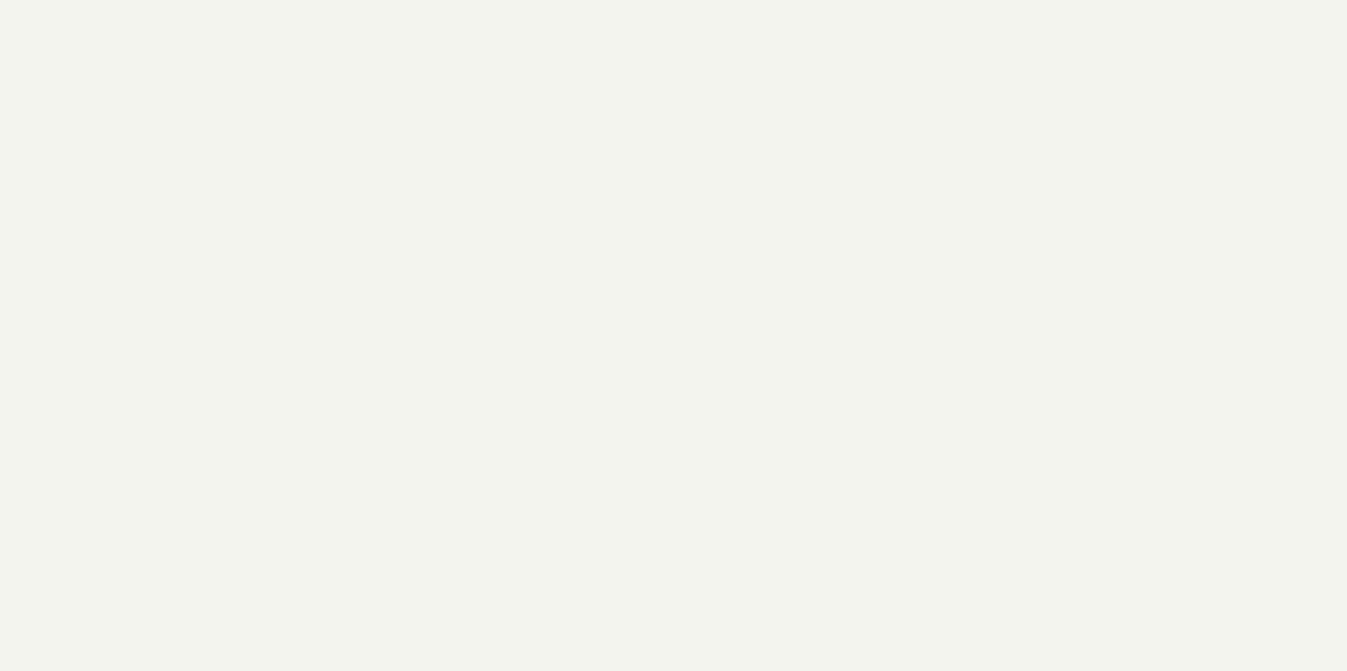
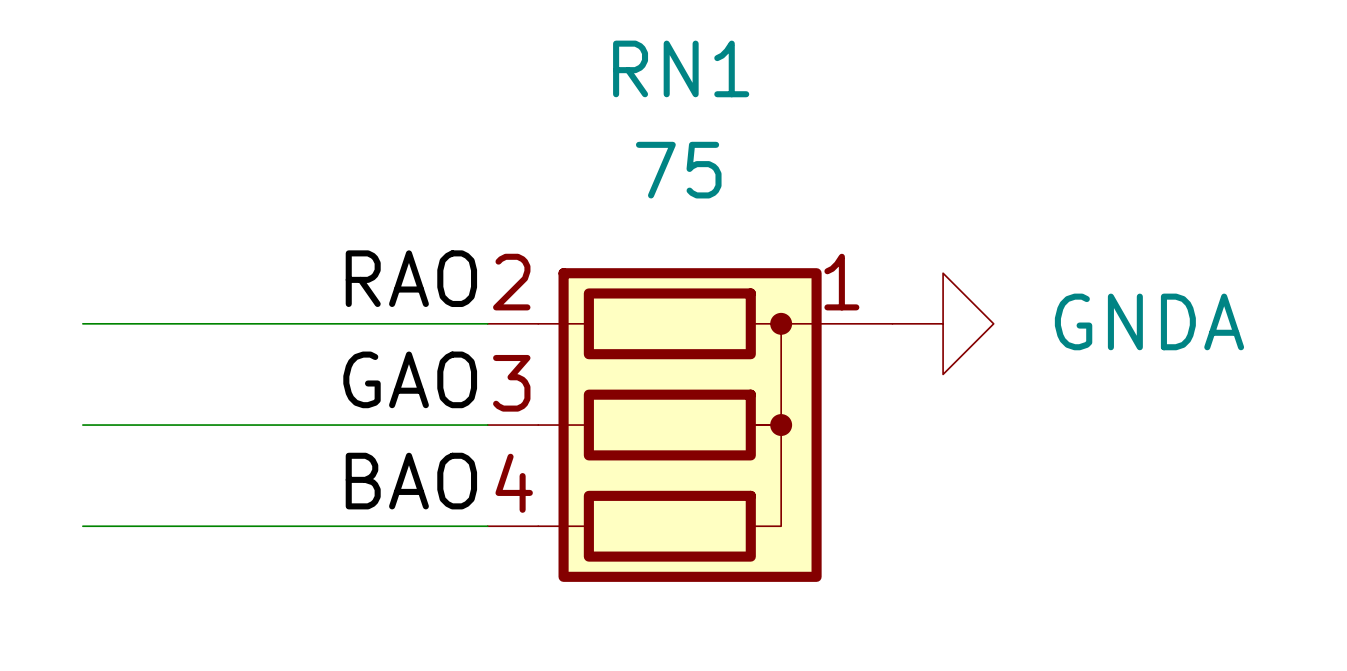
label: none -> RAO (411, 278)
wire: none -> (82, 323) (487, 323)
power symbol: none -> GNDA (943, 323)
label: none -> GAO (410, 379)
wire: none -> (82, 425) (487, 425)
RN1: none -> 75 (690, 425)
label: none -> BAO (411, 481)
wire: none -> (82, 526) (487, 526)

